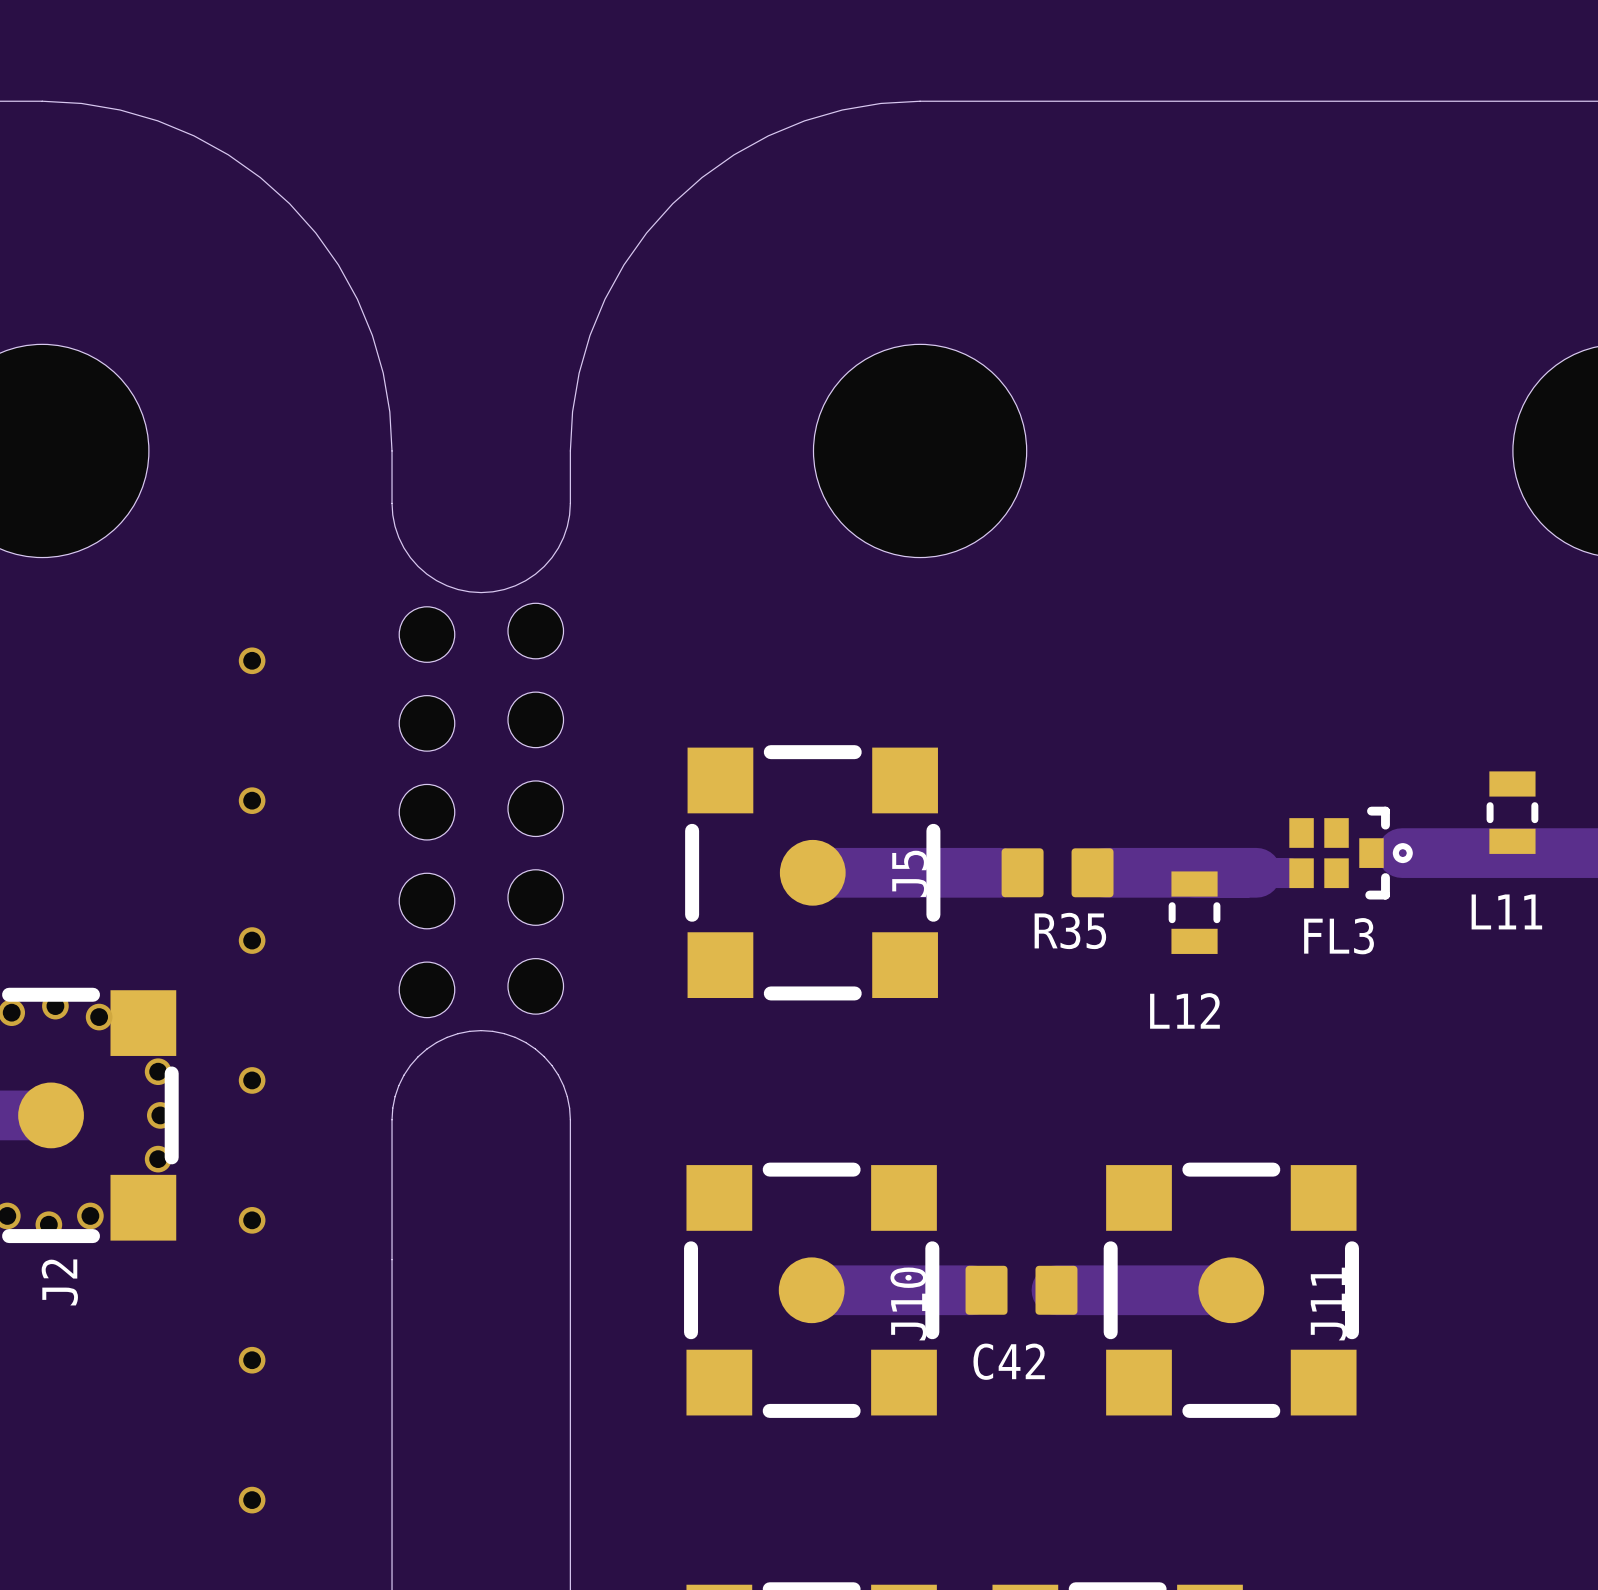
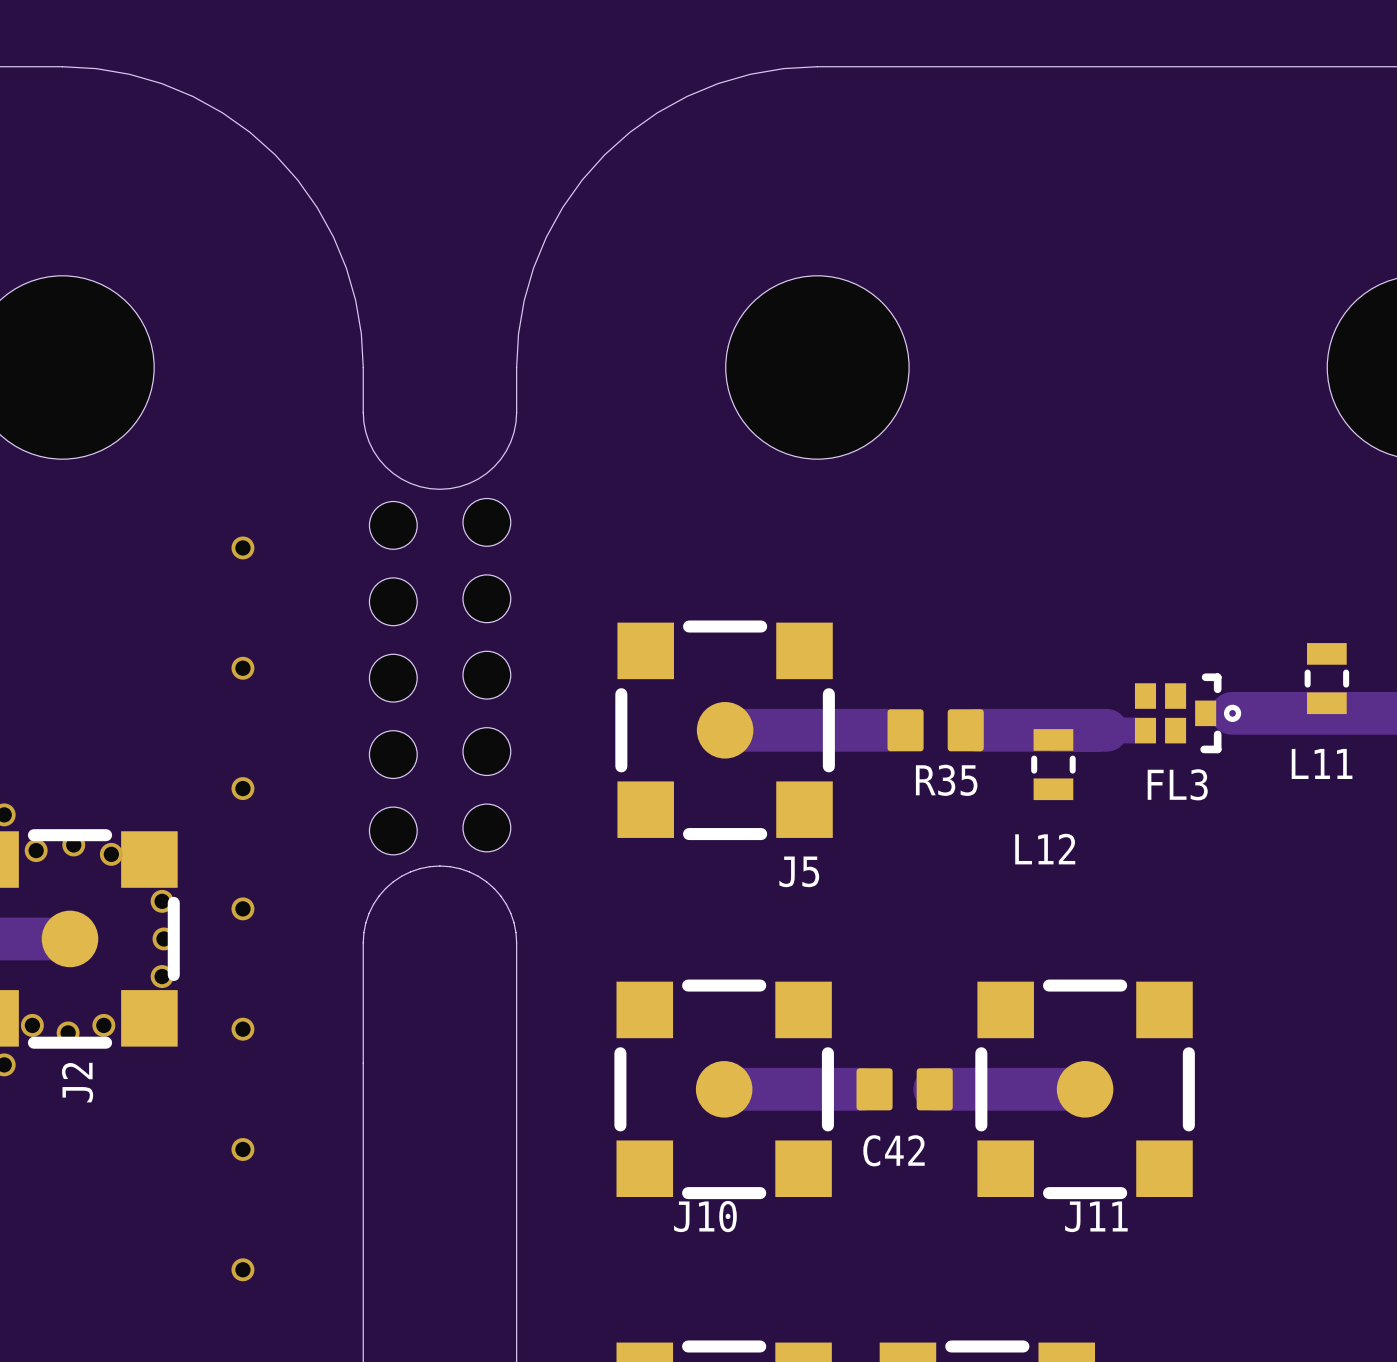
J5 name rotation: 0° (910, 873) -> 90° clockwise (799, 871)
J5 name position: J5 (910, 873) -> J5 (799, 871)
J10 name rotation: 0° (908, 1303) -> 90° clockwise (705, 1216)
J10 name position: J10 (908, 1303) -> J10 (705, 1216)
J11 name rotation: 0° (1328, 1304) -> 90° clockwise (1096, 1216)
J11 name position: J11 (1328, 1304) -> J11 (1096, 1216)

